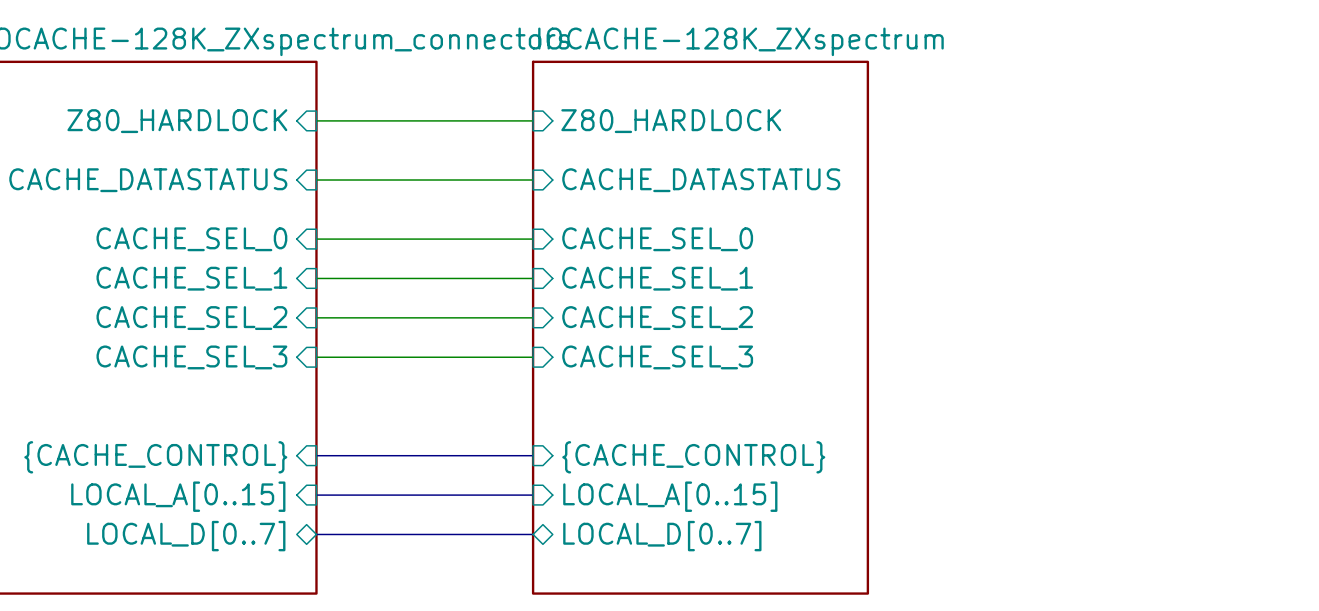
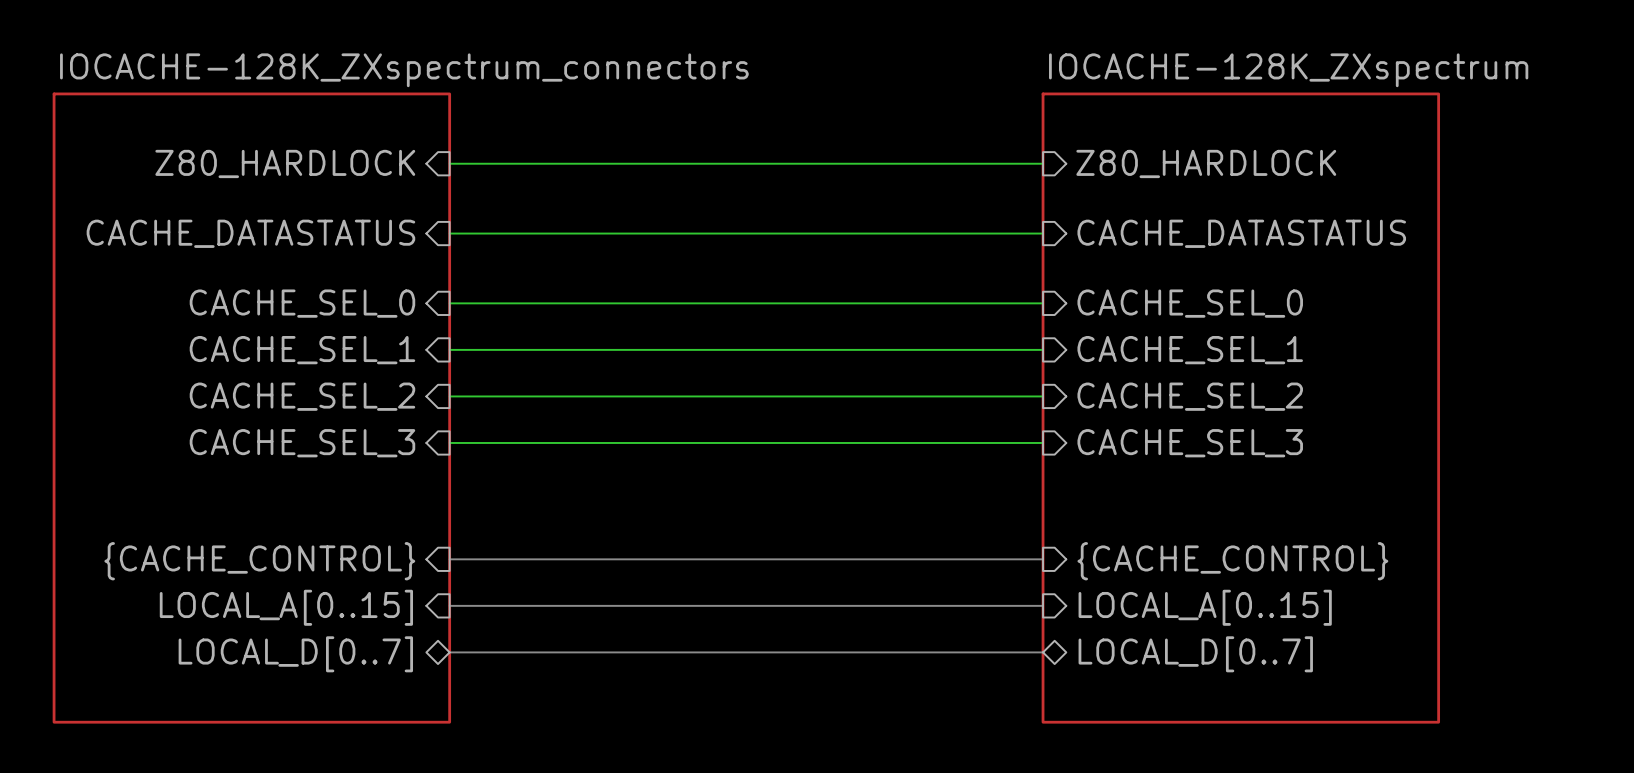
wire: none -> (705, 163) (1043, 163)
sheet pin position: Z80_HARDLOCK (671, 121) -> Z80_HARDLOCK (1206, 163)
wire: none -> (705, 233) (1043, 233)
sheet pin position: CACHE_DATASTATUS (701, 180) -> CACHE_DATASTATUS (1241, 233)
wire: none -> (705, 303) (1043, 303)
sheet pin position: CACHE_SEL_0 (657, 239) -> CACHE_SEL_0 (1190, 303)
wire: none -> (705, 349) (1043, 349)
sheet pin position: CACHE_SEL_1 (657, 278) -> CACHE_SEL_1 (1190, 350)
wire: none -> (705, 396) (1043, 396)
sheet pin position: CACHE_SEL_2 (657, 318) -> CACHE_SEL_2 (1190, 396)
sheet IOCACHE-128K_ZXspectrum position: (700, 327) -> (1240, 408)
wire: none -> (705, 442) (1043, 442)
sheet pin position: CACHE_SEL_3 (657, 357) -> CACHE_SEL_3 (1190, 443)
bus: none -> (705, 559) (1043, 559)
sheet pin position: {CACHE_CONTROL} (693, 457) -> {CACHE_CONTROL} (1232, 561)
bus: none -> (705, 605) (1043, 605)
sheet pin position: LOCAL_A[0..15] (670, 496) -> LOCAL_A[0..15] (1205, 607)
bus: none -> (705, 652) (1043, 652)
sheet pin position: LOCAL_D[0..7] (662, 536) -> LOCAL_D[0..7] (1195, 654)

